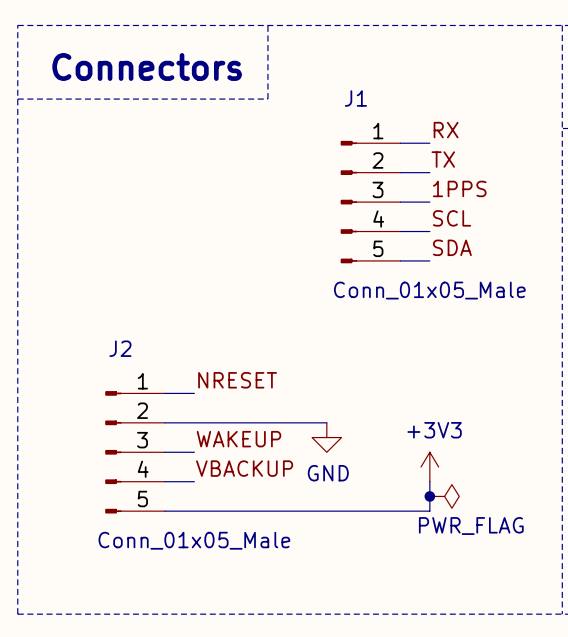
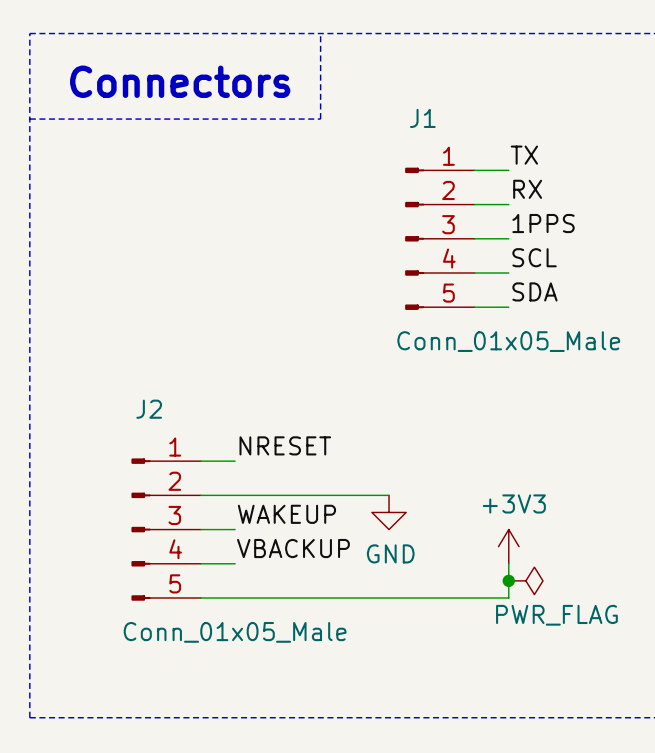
label: RX (446, 130) -> TX (524, 155)
label: TX (443, 159) -> RX (527, 189)

